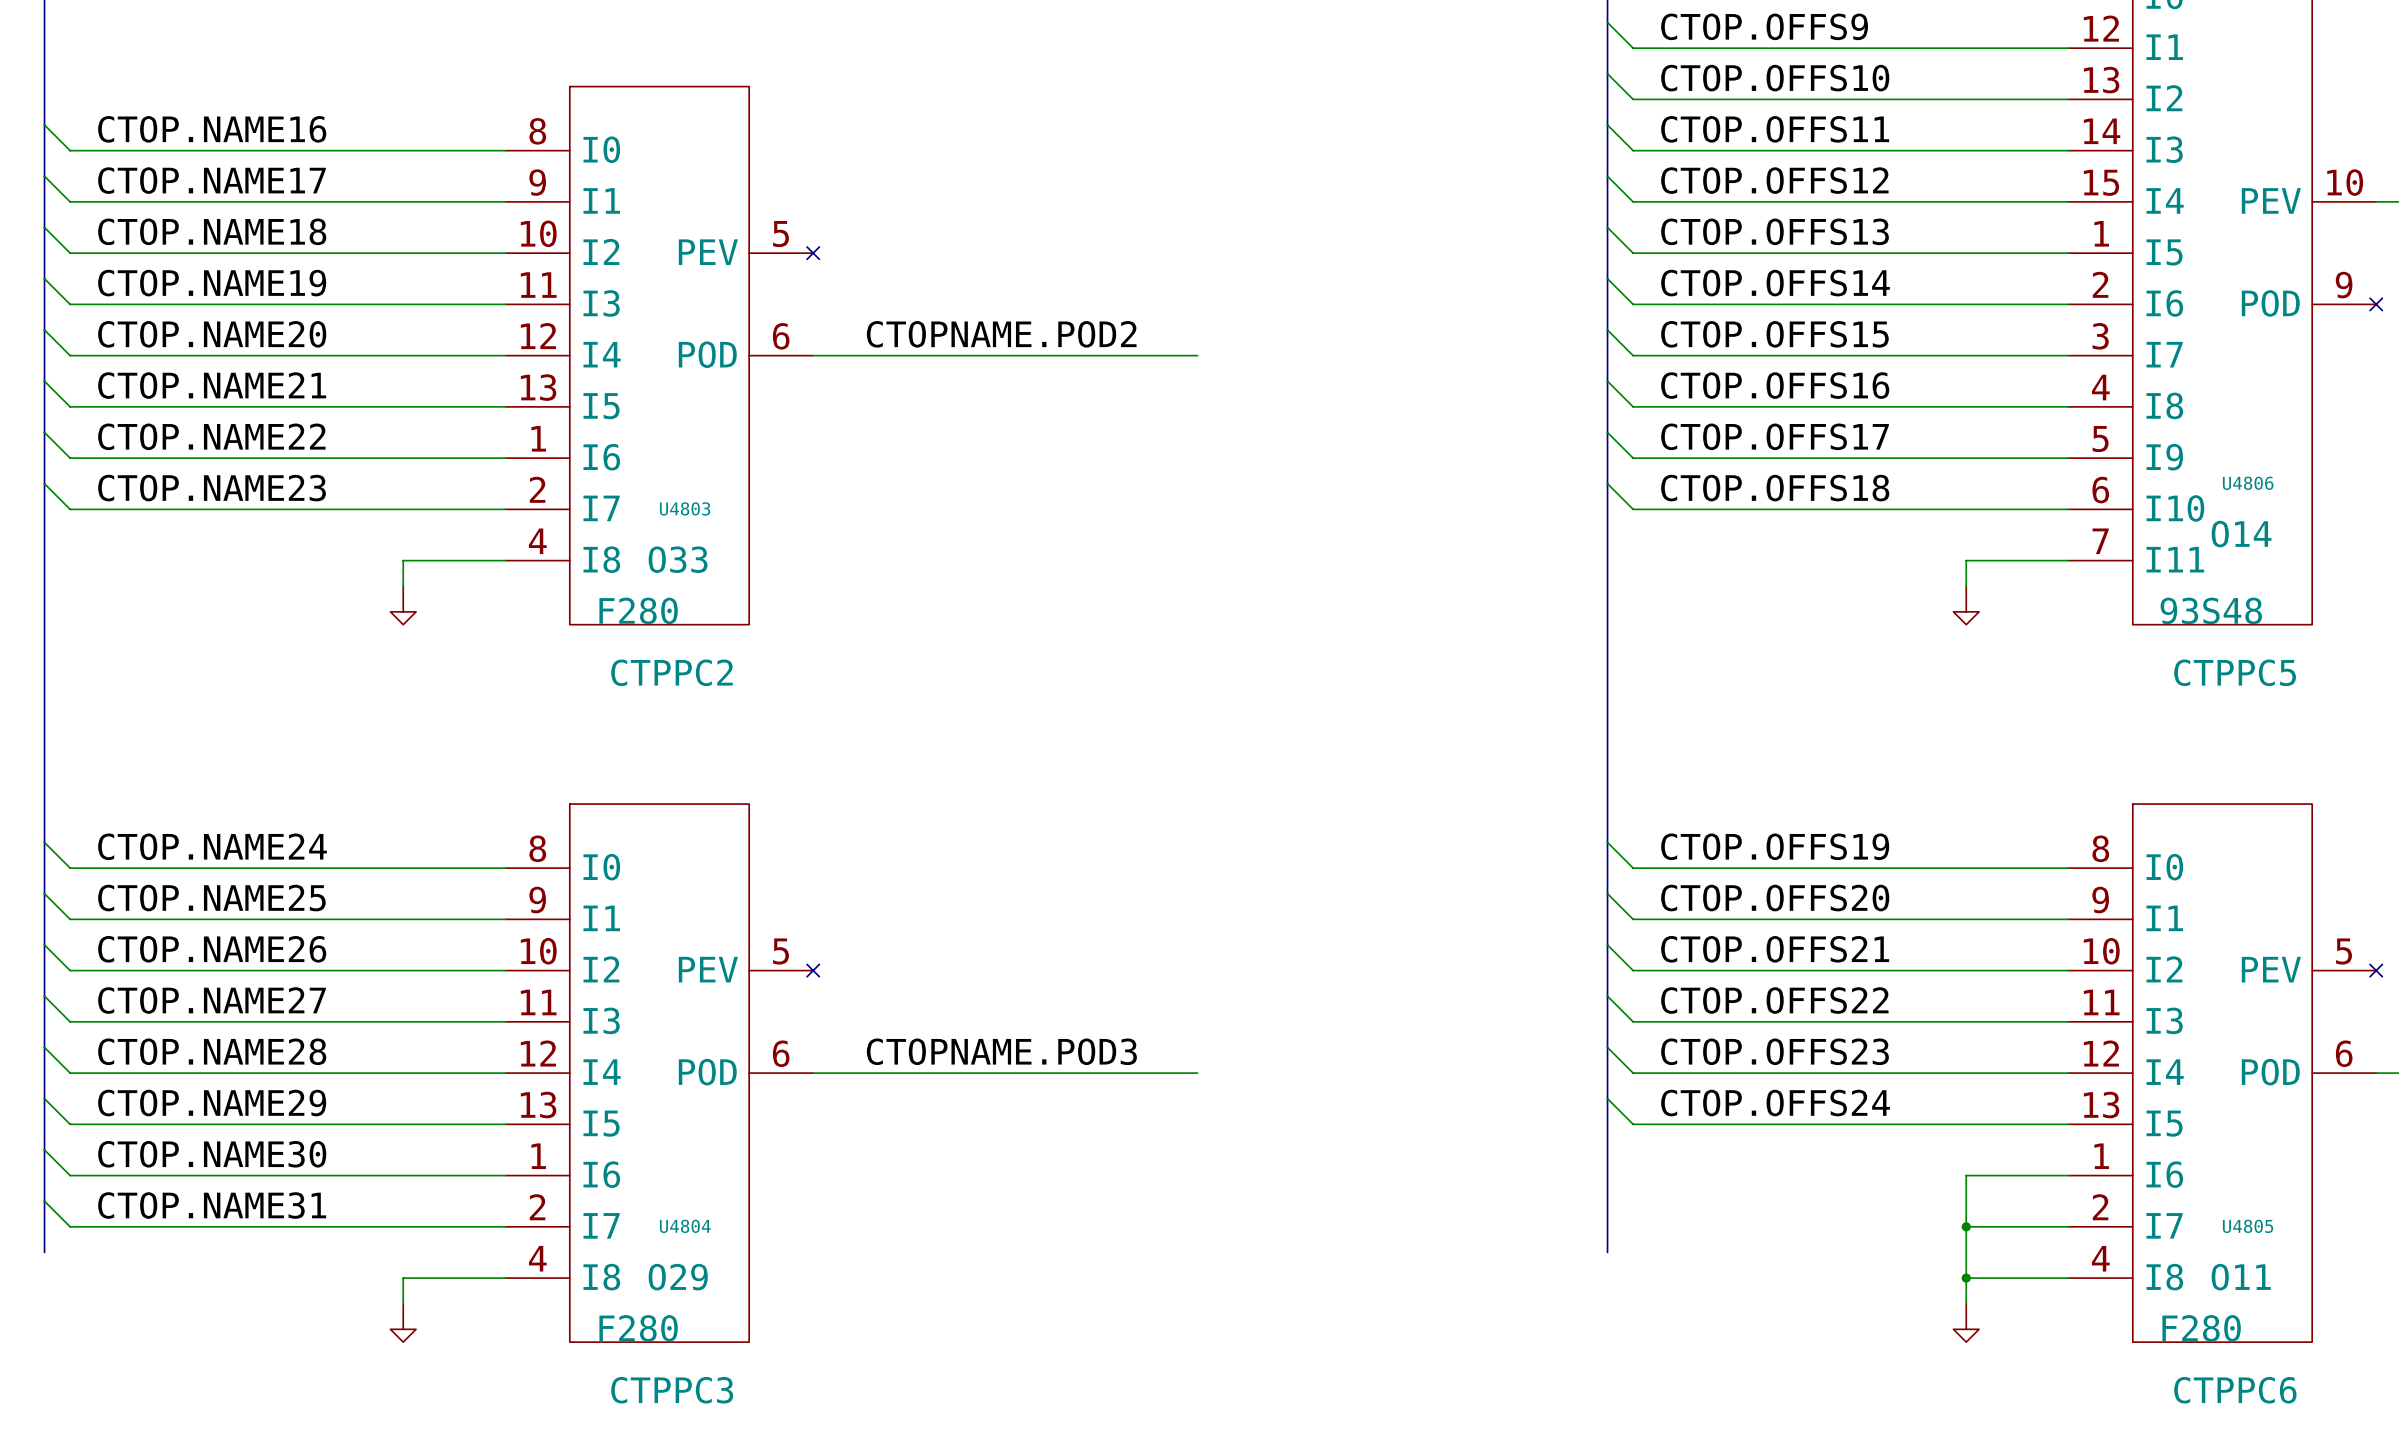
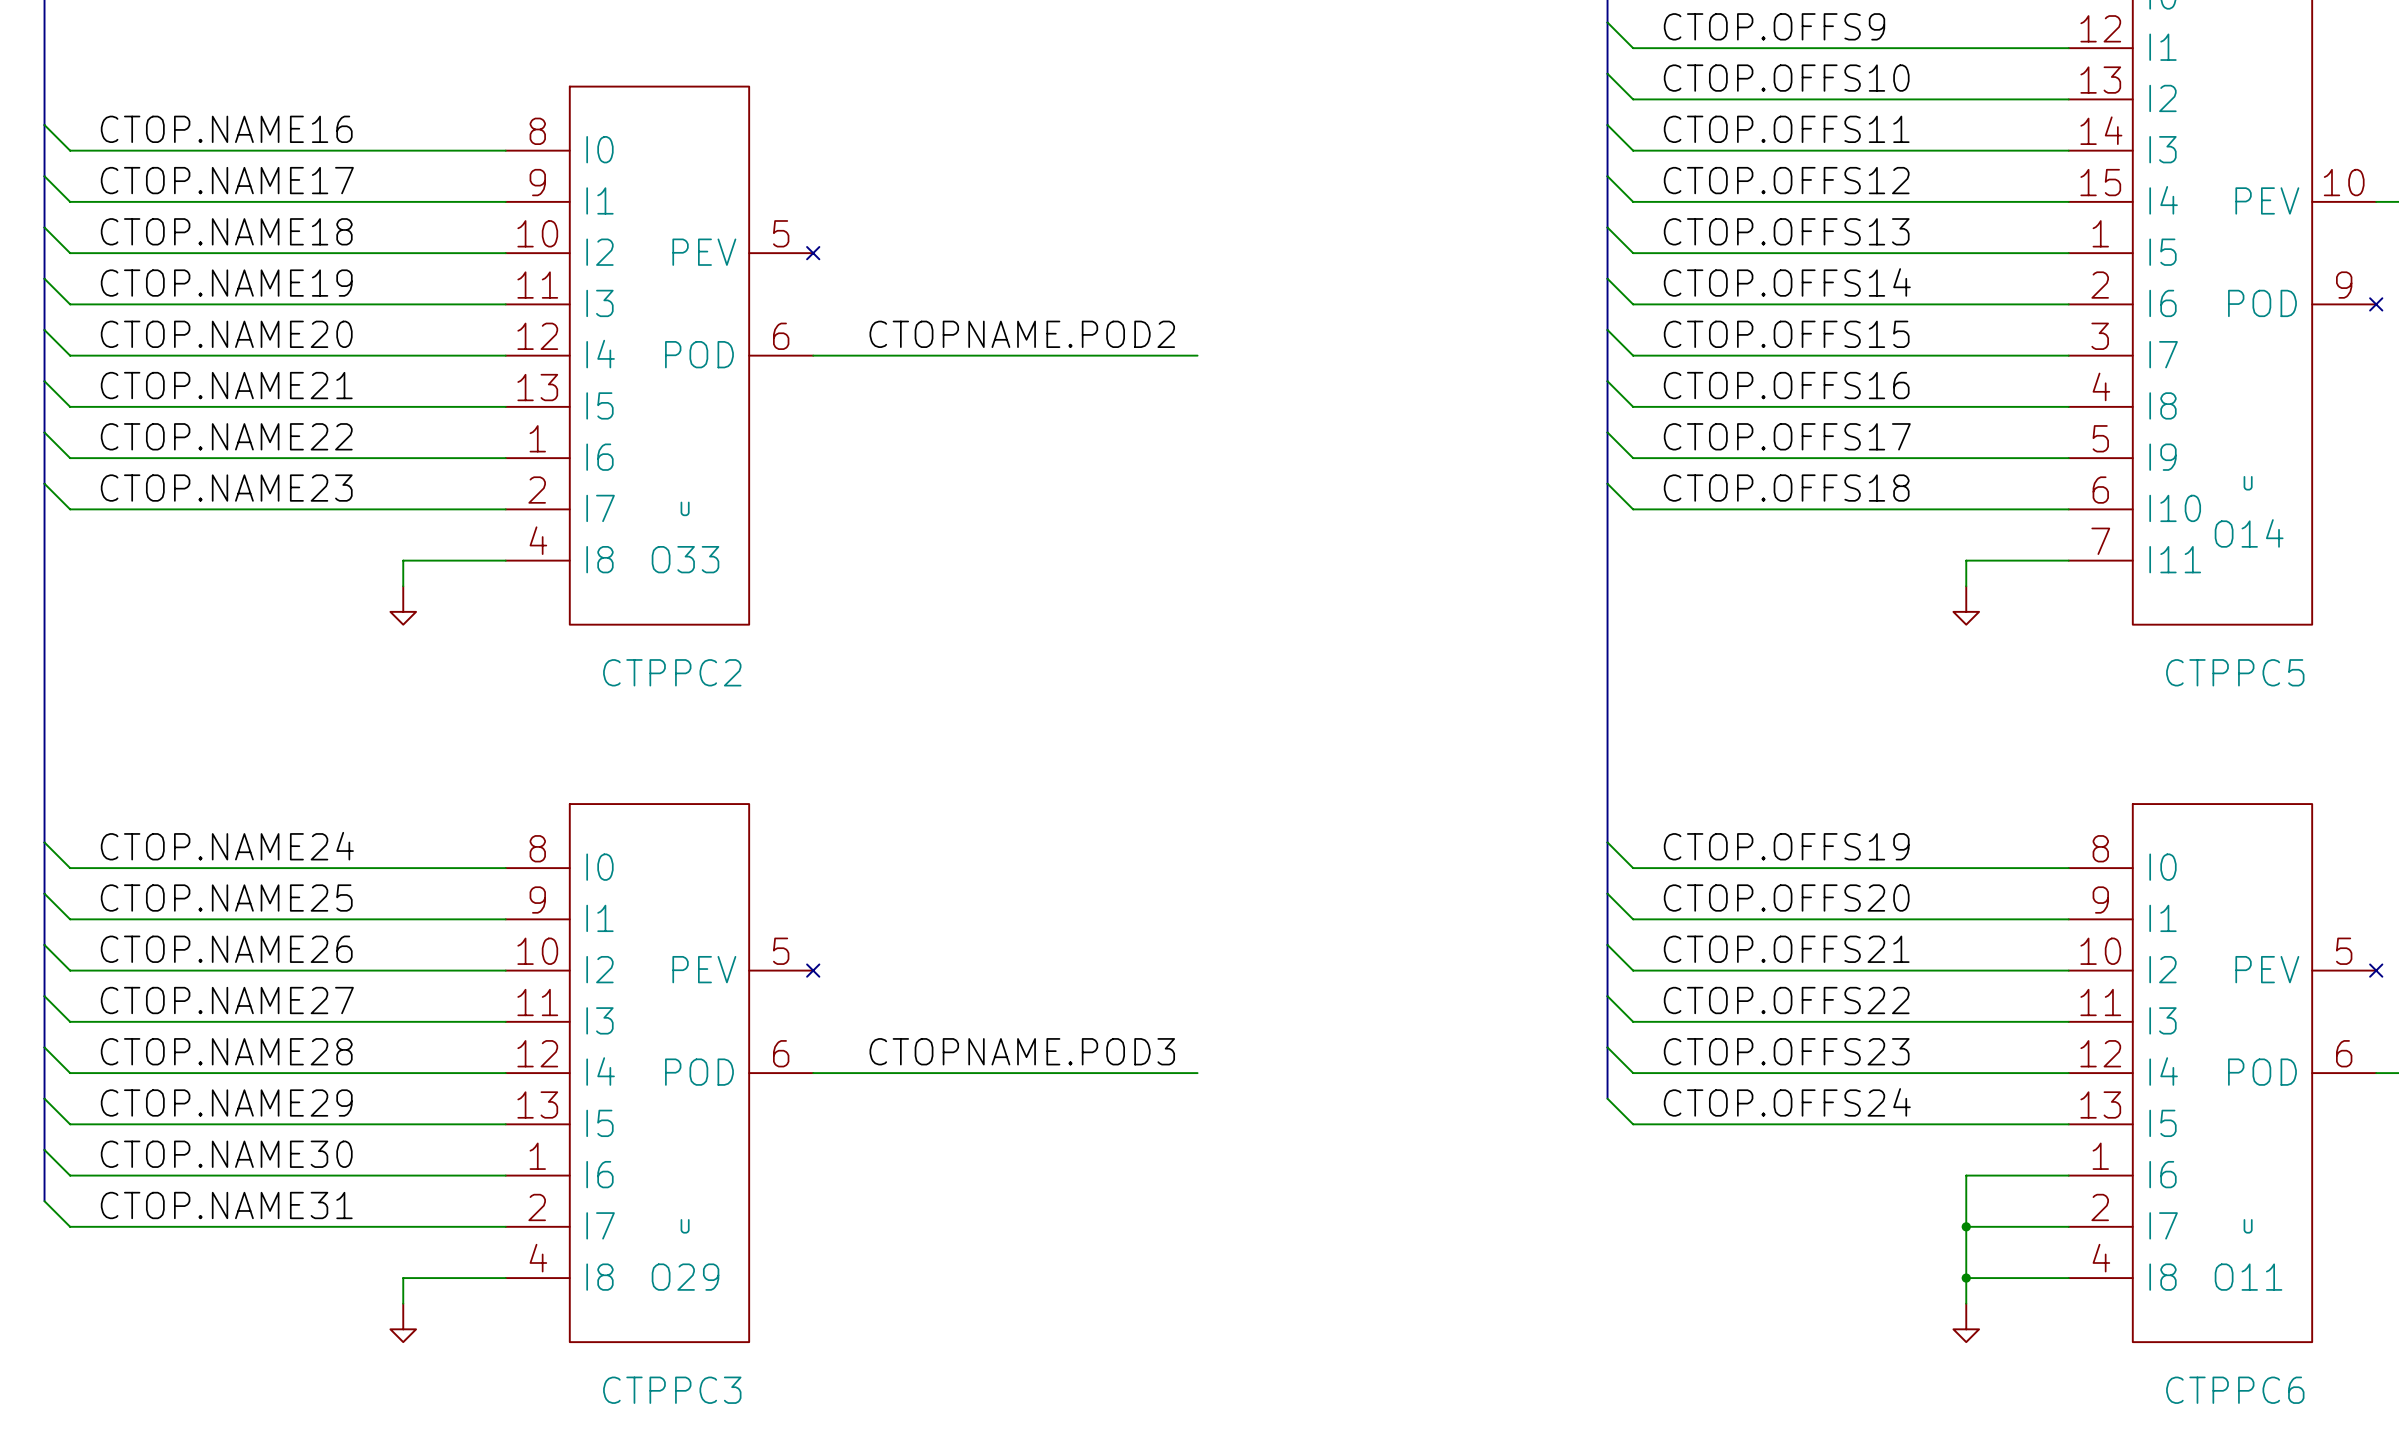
U4806 name: U4806 (2248, 483) -> U (2248, 483)
U4803 name: U4803 (685, 508) -> U (685, 508)
U4803 value: F280 (638, 610) -> none
U4806 value: 93S48 (2211, 610) -> none
bus: (1607, 1098) (1607, 1252) -> none
bus: (44, 1201) (44, 1252) -> none
U4804 name: U4804 (685, 1226) -> U (685, 1226)
U4805 name: U4805 (2248, 1226) -> U (2248, 1226)
U4804 value: F280 (638, 1328) -> none
U4805 value: F280 (2201, 1328) -> none

